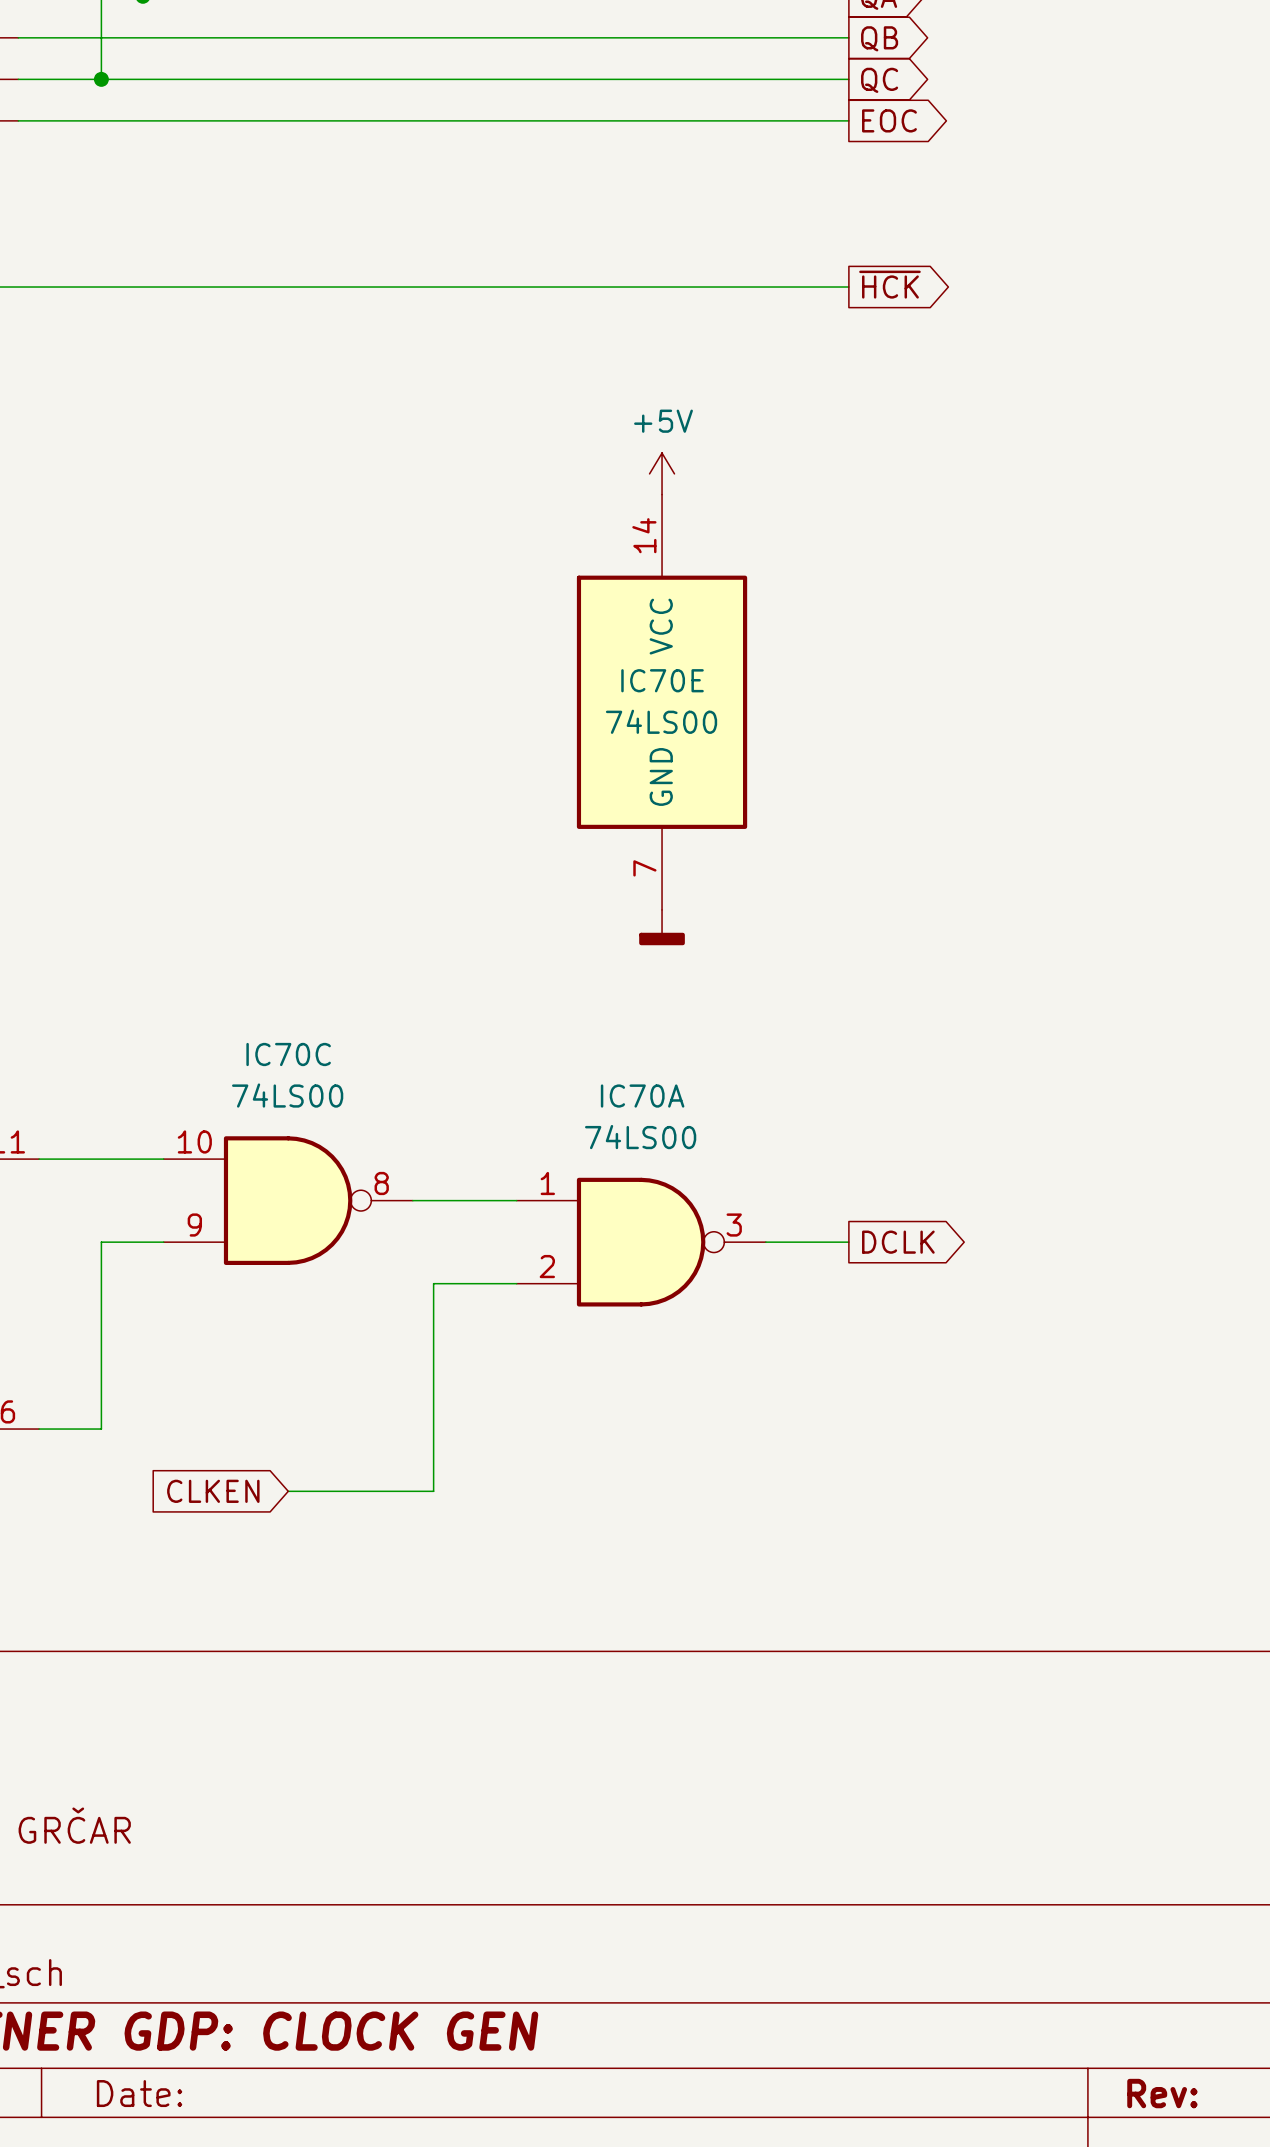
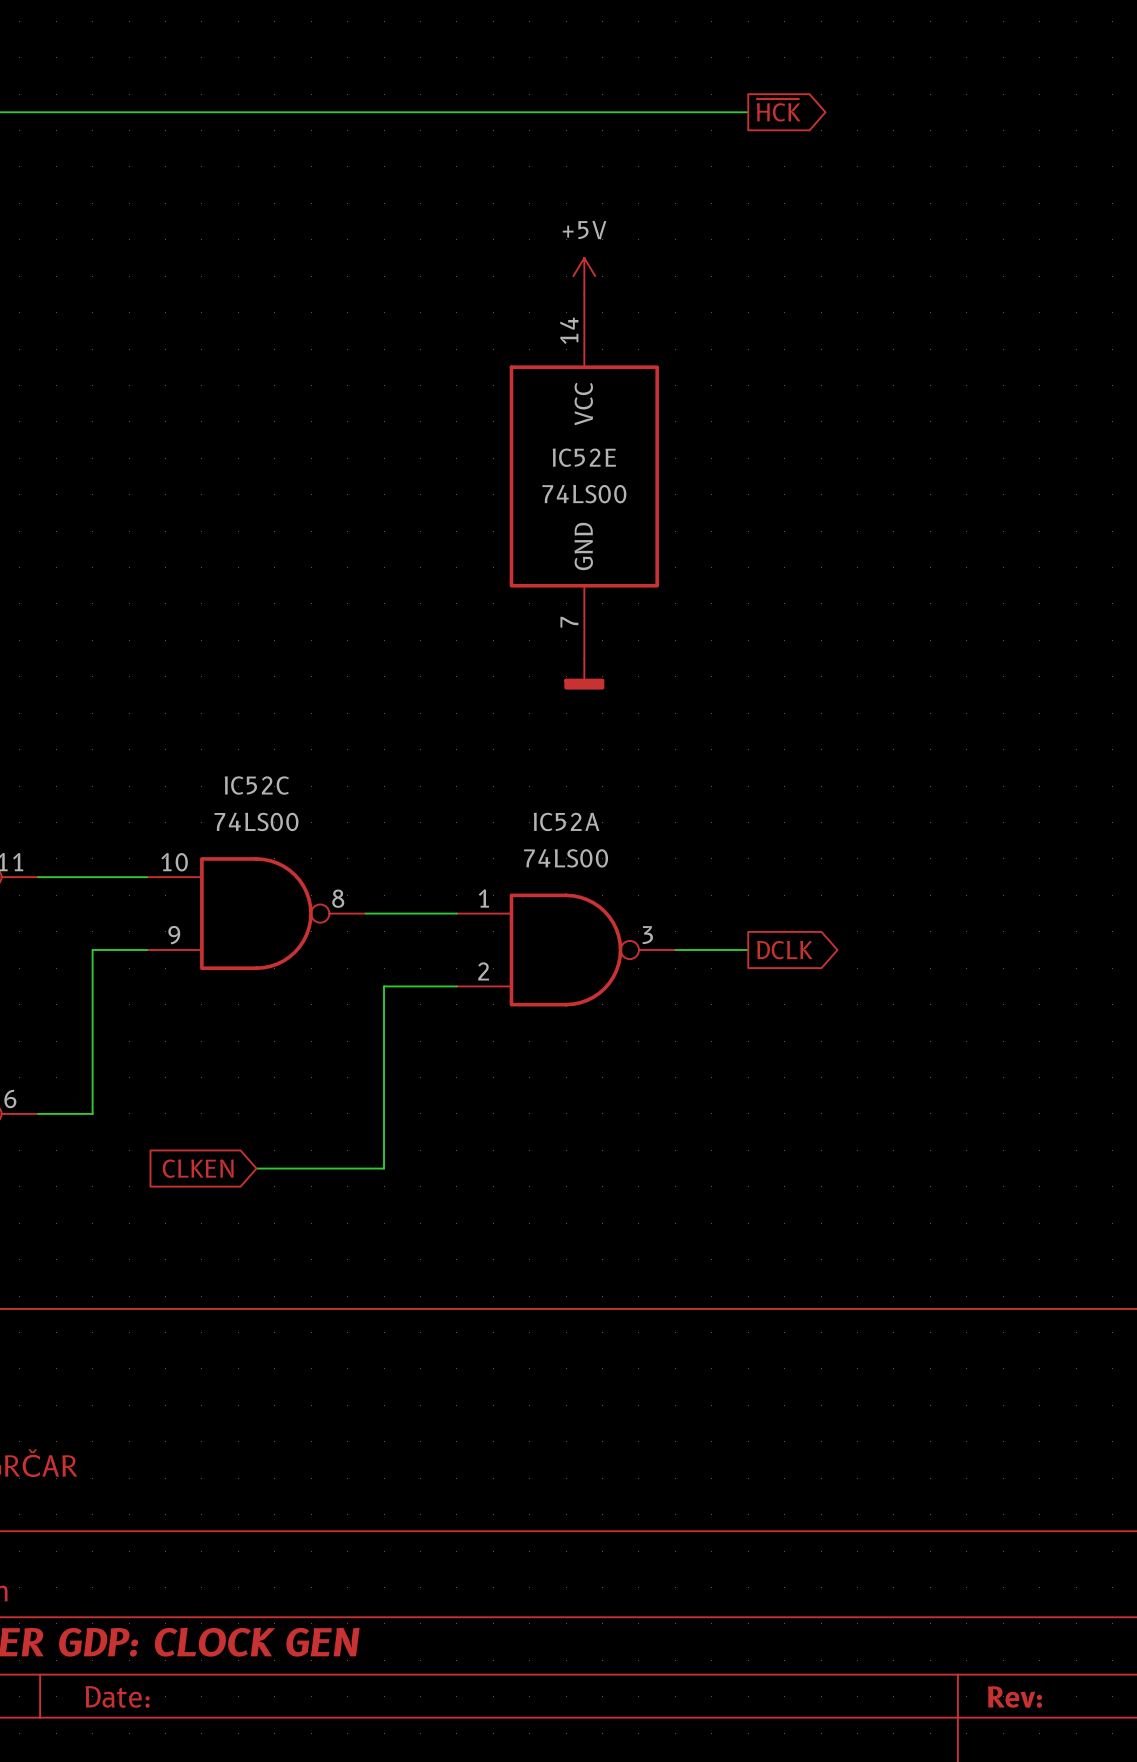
IC70E name: IC70E (662, 680) -> IC52E (584, 457)
IC70C name: IC70C (288, 1054) -> IC52C (256, 785)
IC70A name: IC70A (642, 1096) -> IC52A (566, 821)

